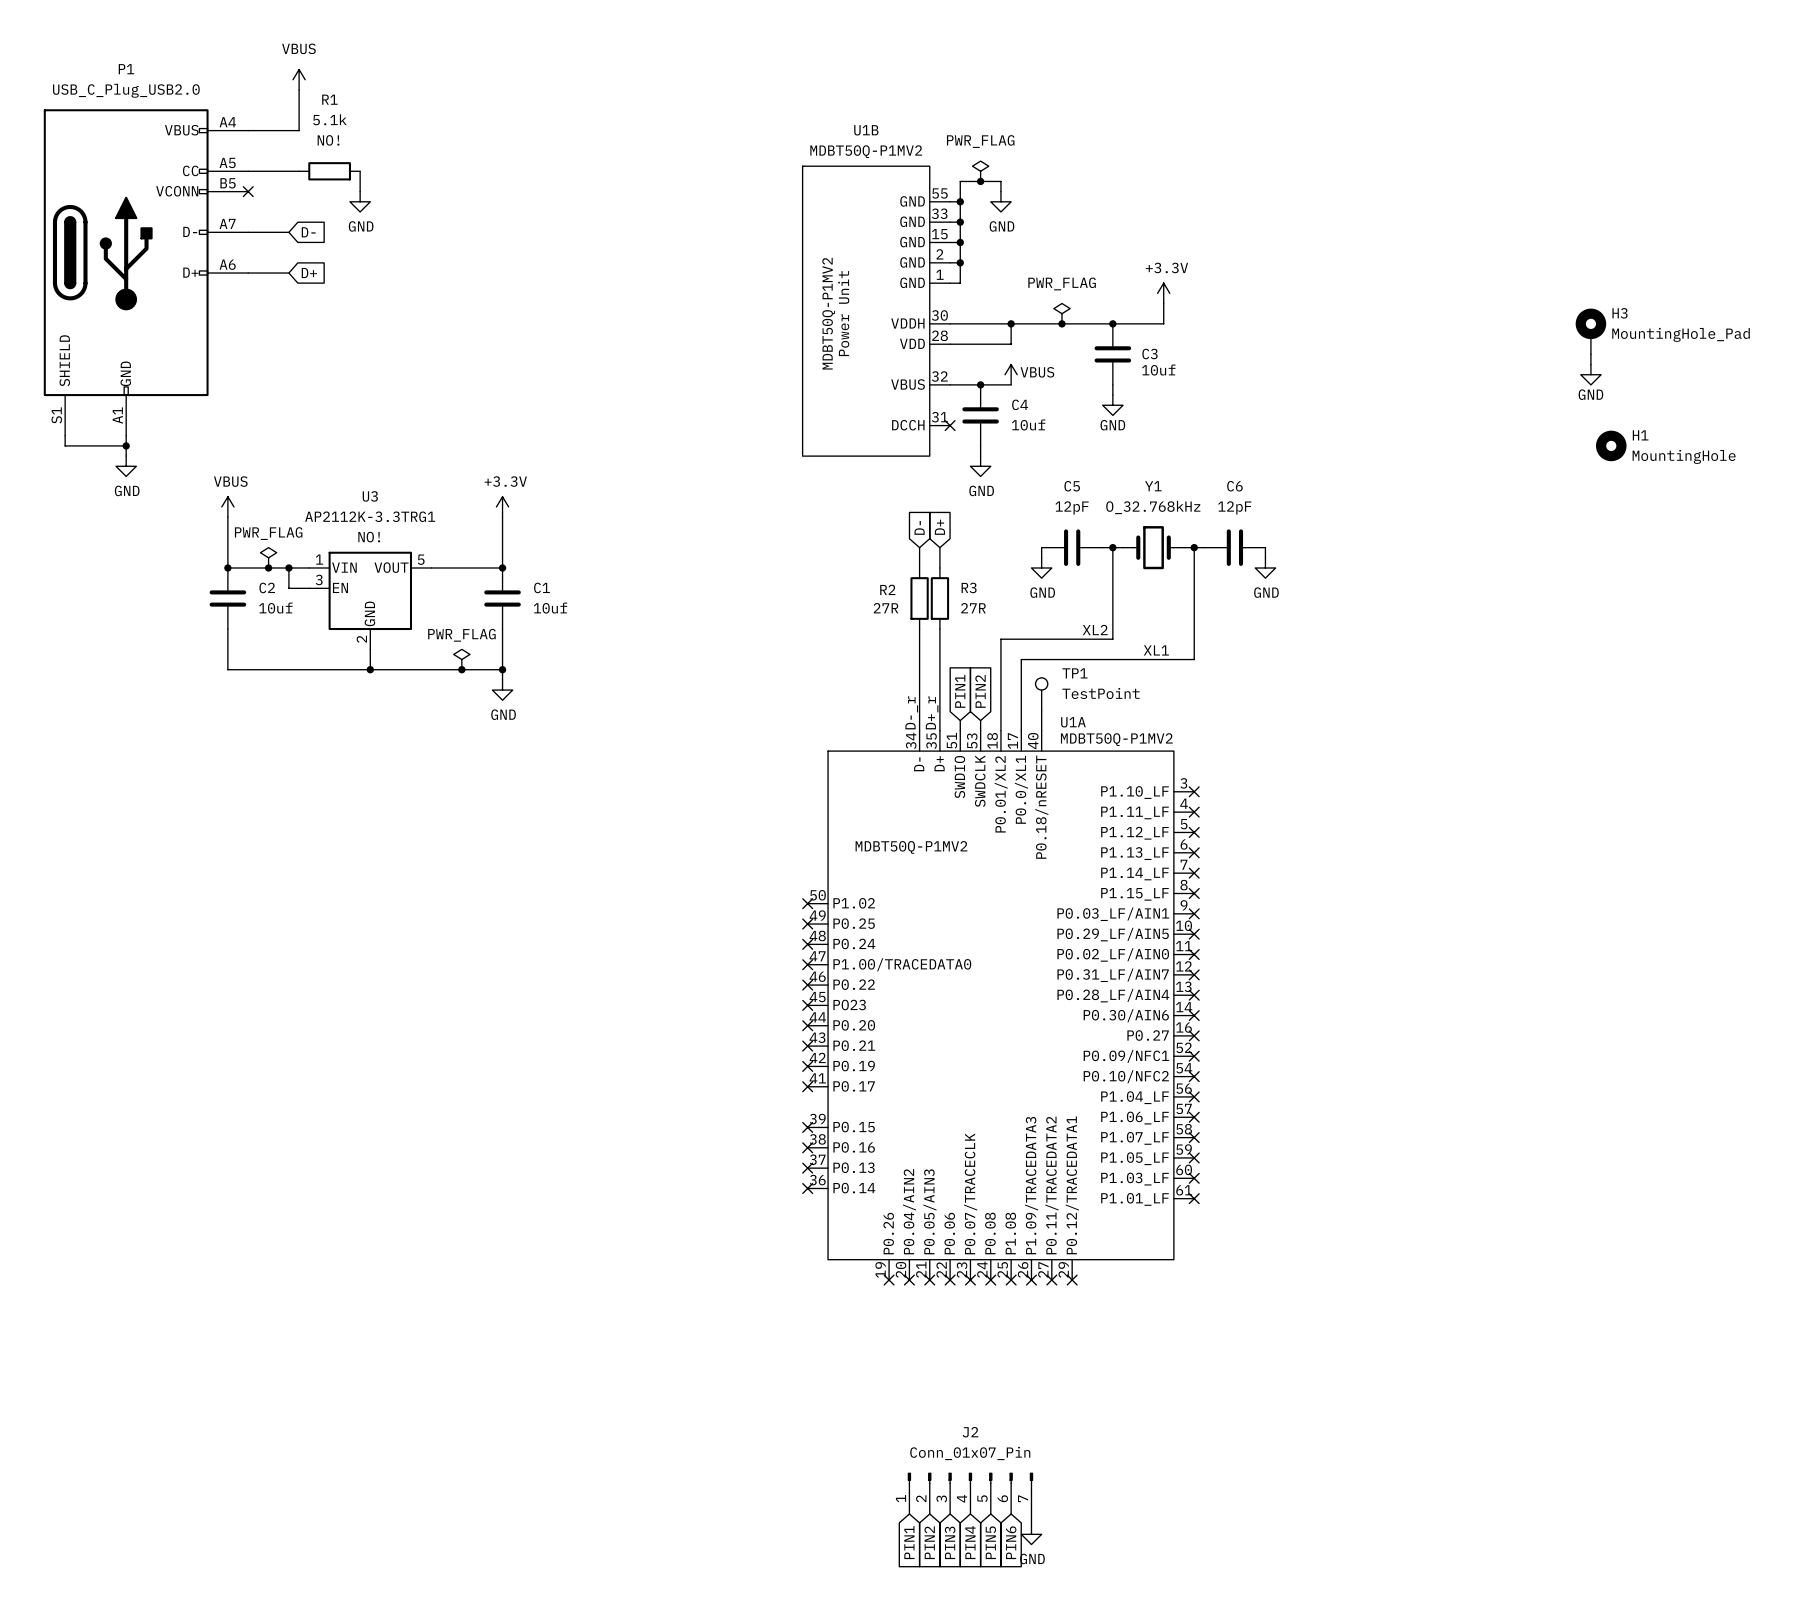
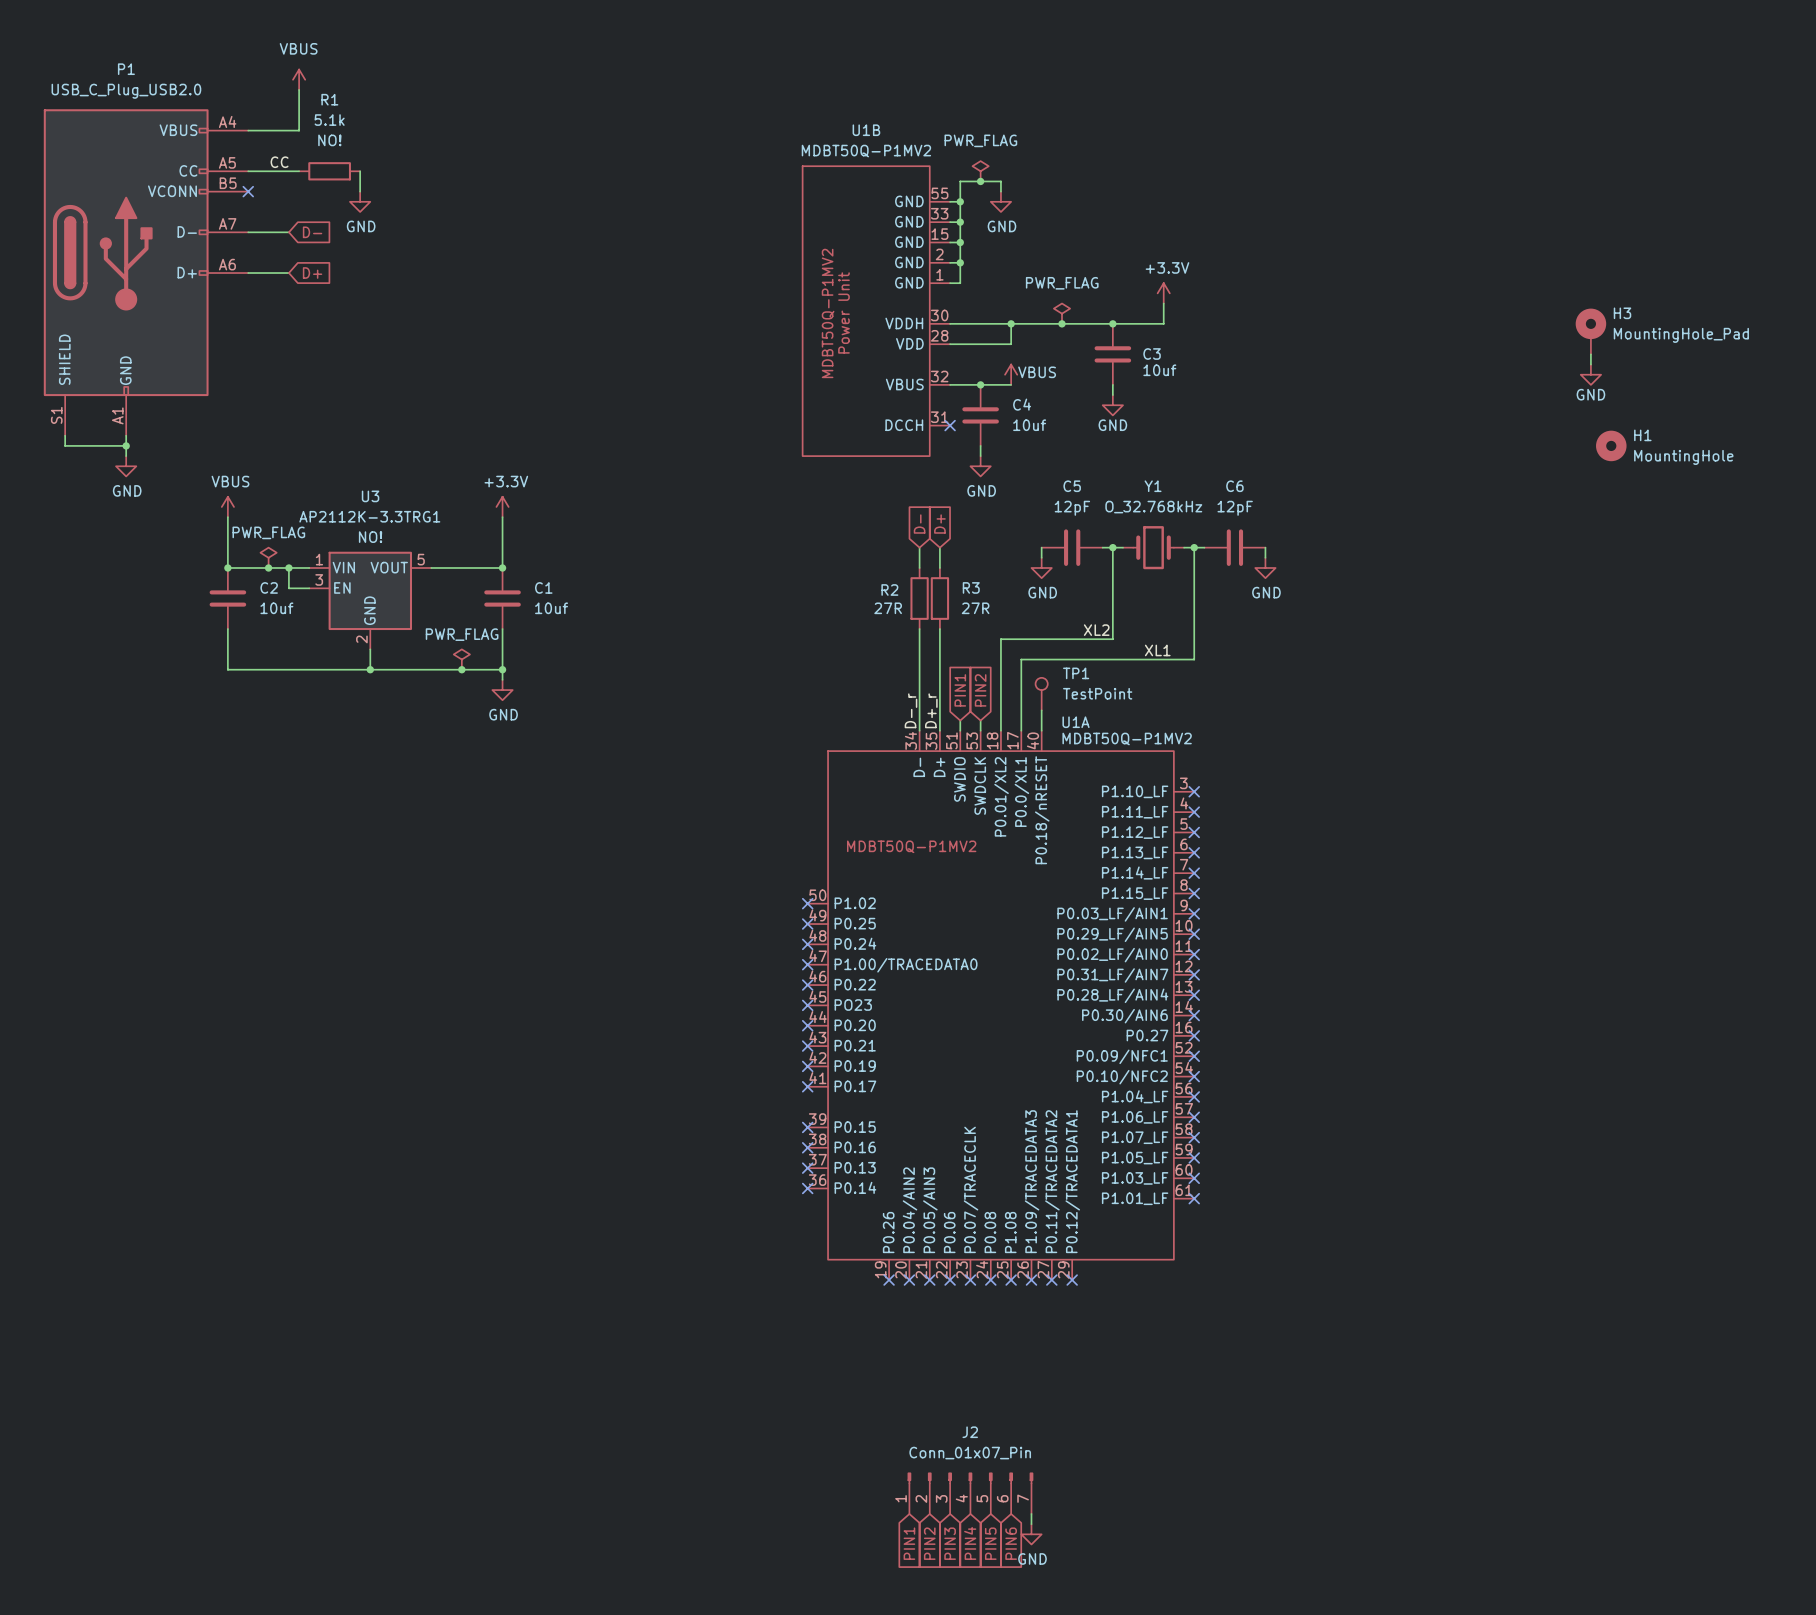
label: none -> CC (279, 162)

